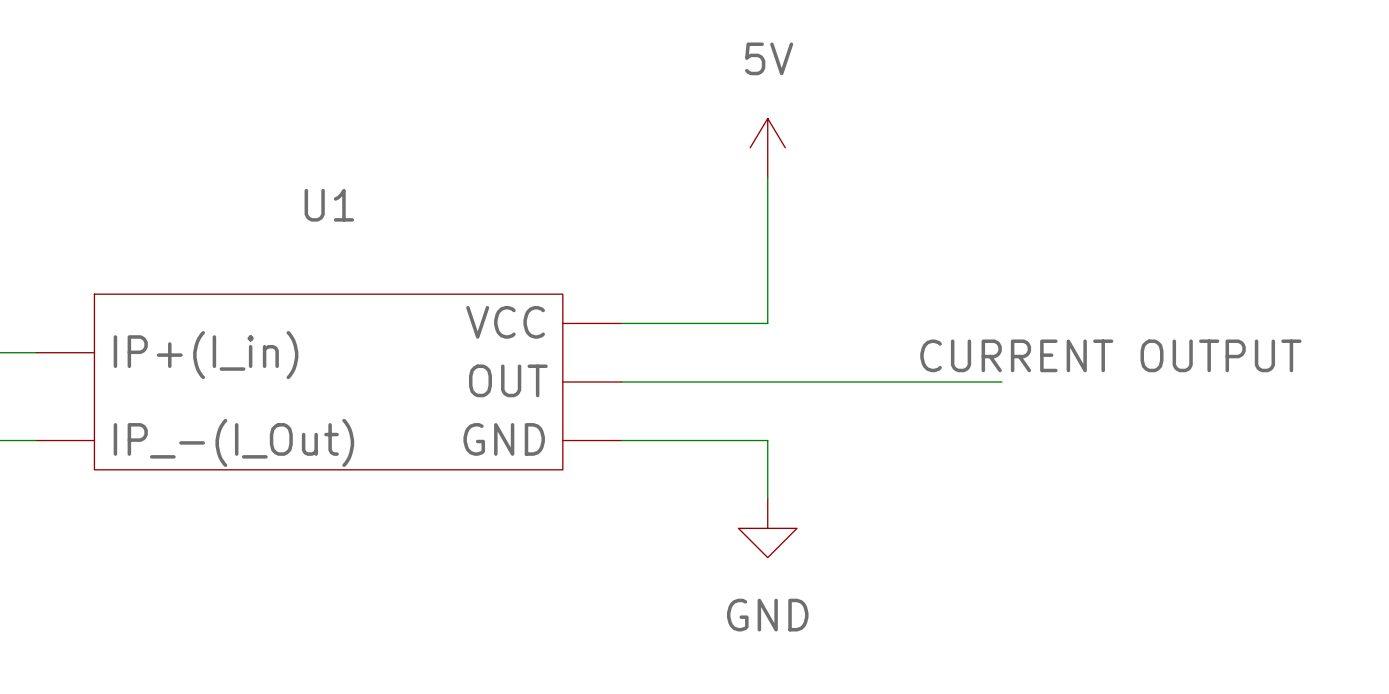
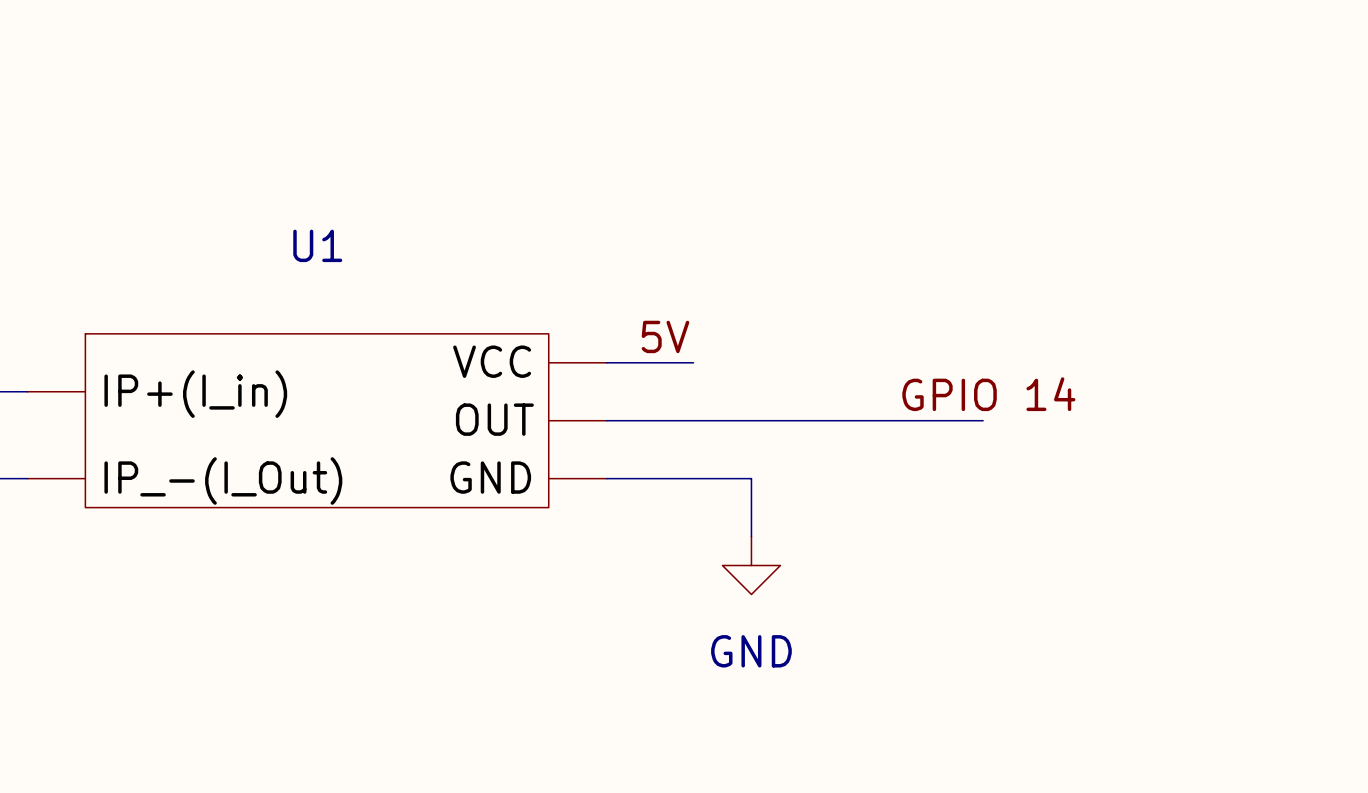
power symbol: 5V (767, 147) -> none
wire: (767, 177) (767, 323) (709, 323) -> none
label: none -> 5V (665, 336)
label: CURRENT OUTPUT (1110, 355) -> GPIO 14 (988, 394)

